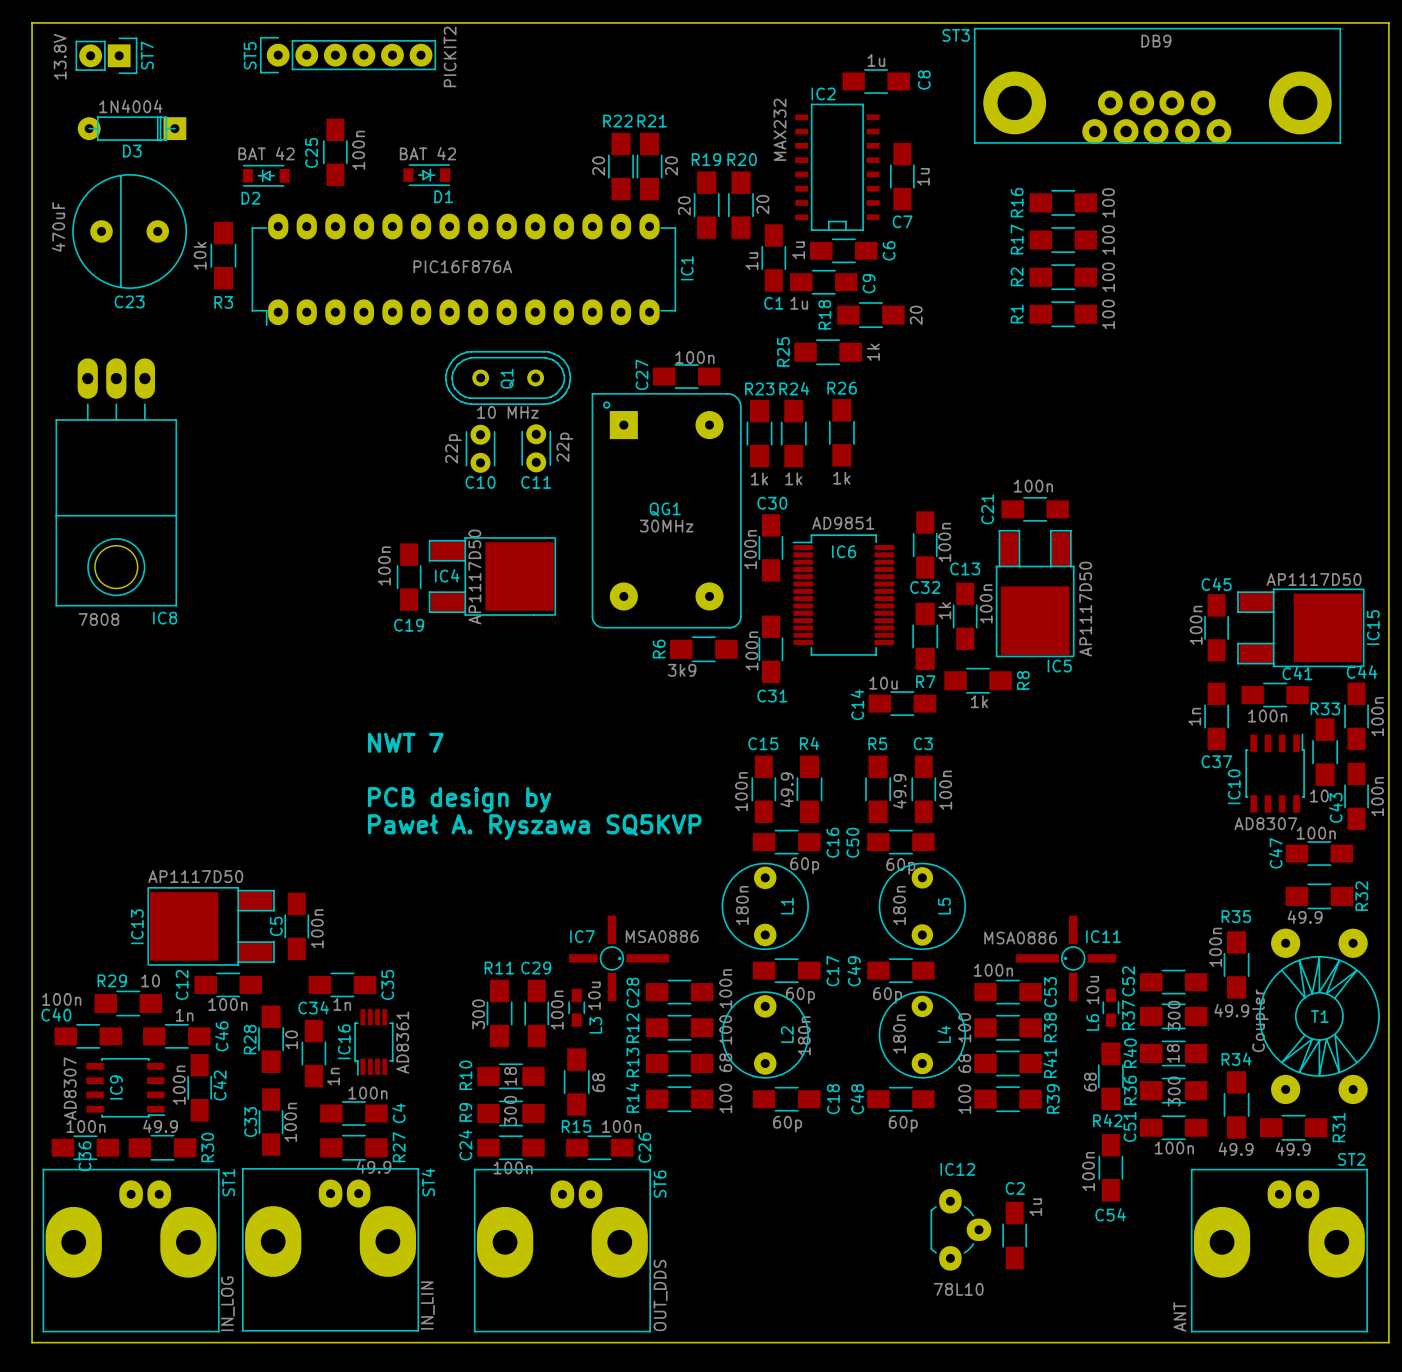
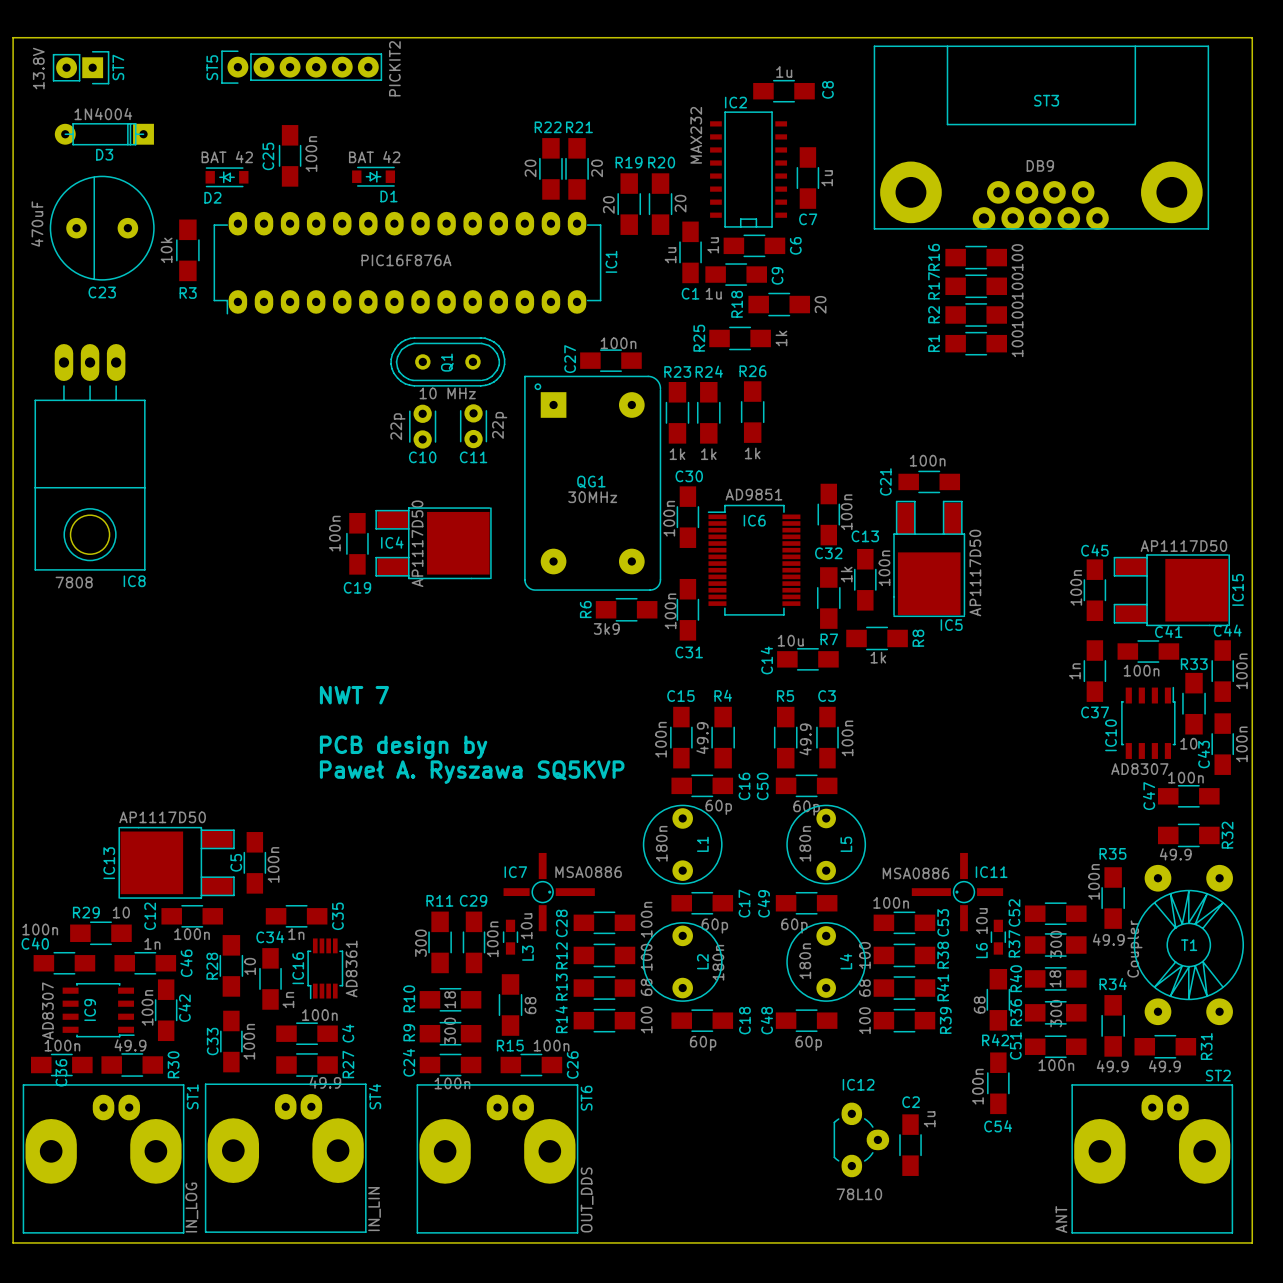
ST3 footprint: [973, 27, 1342, 144] -> [873, 45, 1210, 230]
ST3 name position: ST3 (956, 35) -> ST3 (1046, 100)
ST3 value position: DB9 (1156, 41) -> DB9 (1040, 165)
R16 position: (1063, 202) -> (976, 257)
R17 position: (1063, 240) -> (976, 286)
R2 position: (1063, 277) -> (976, 314)
R1 position: (1063, 314) -> (976, 343)

